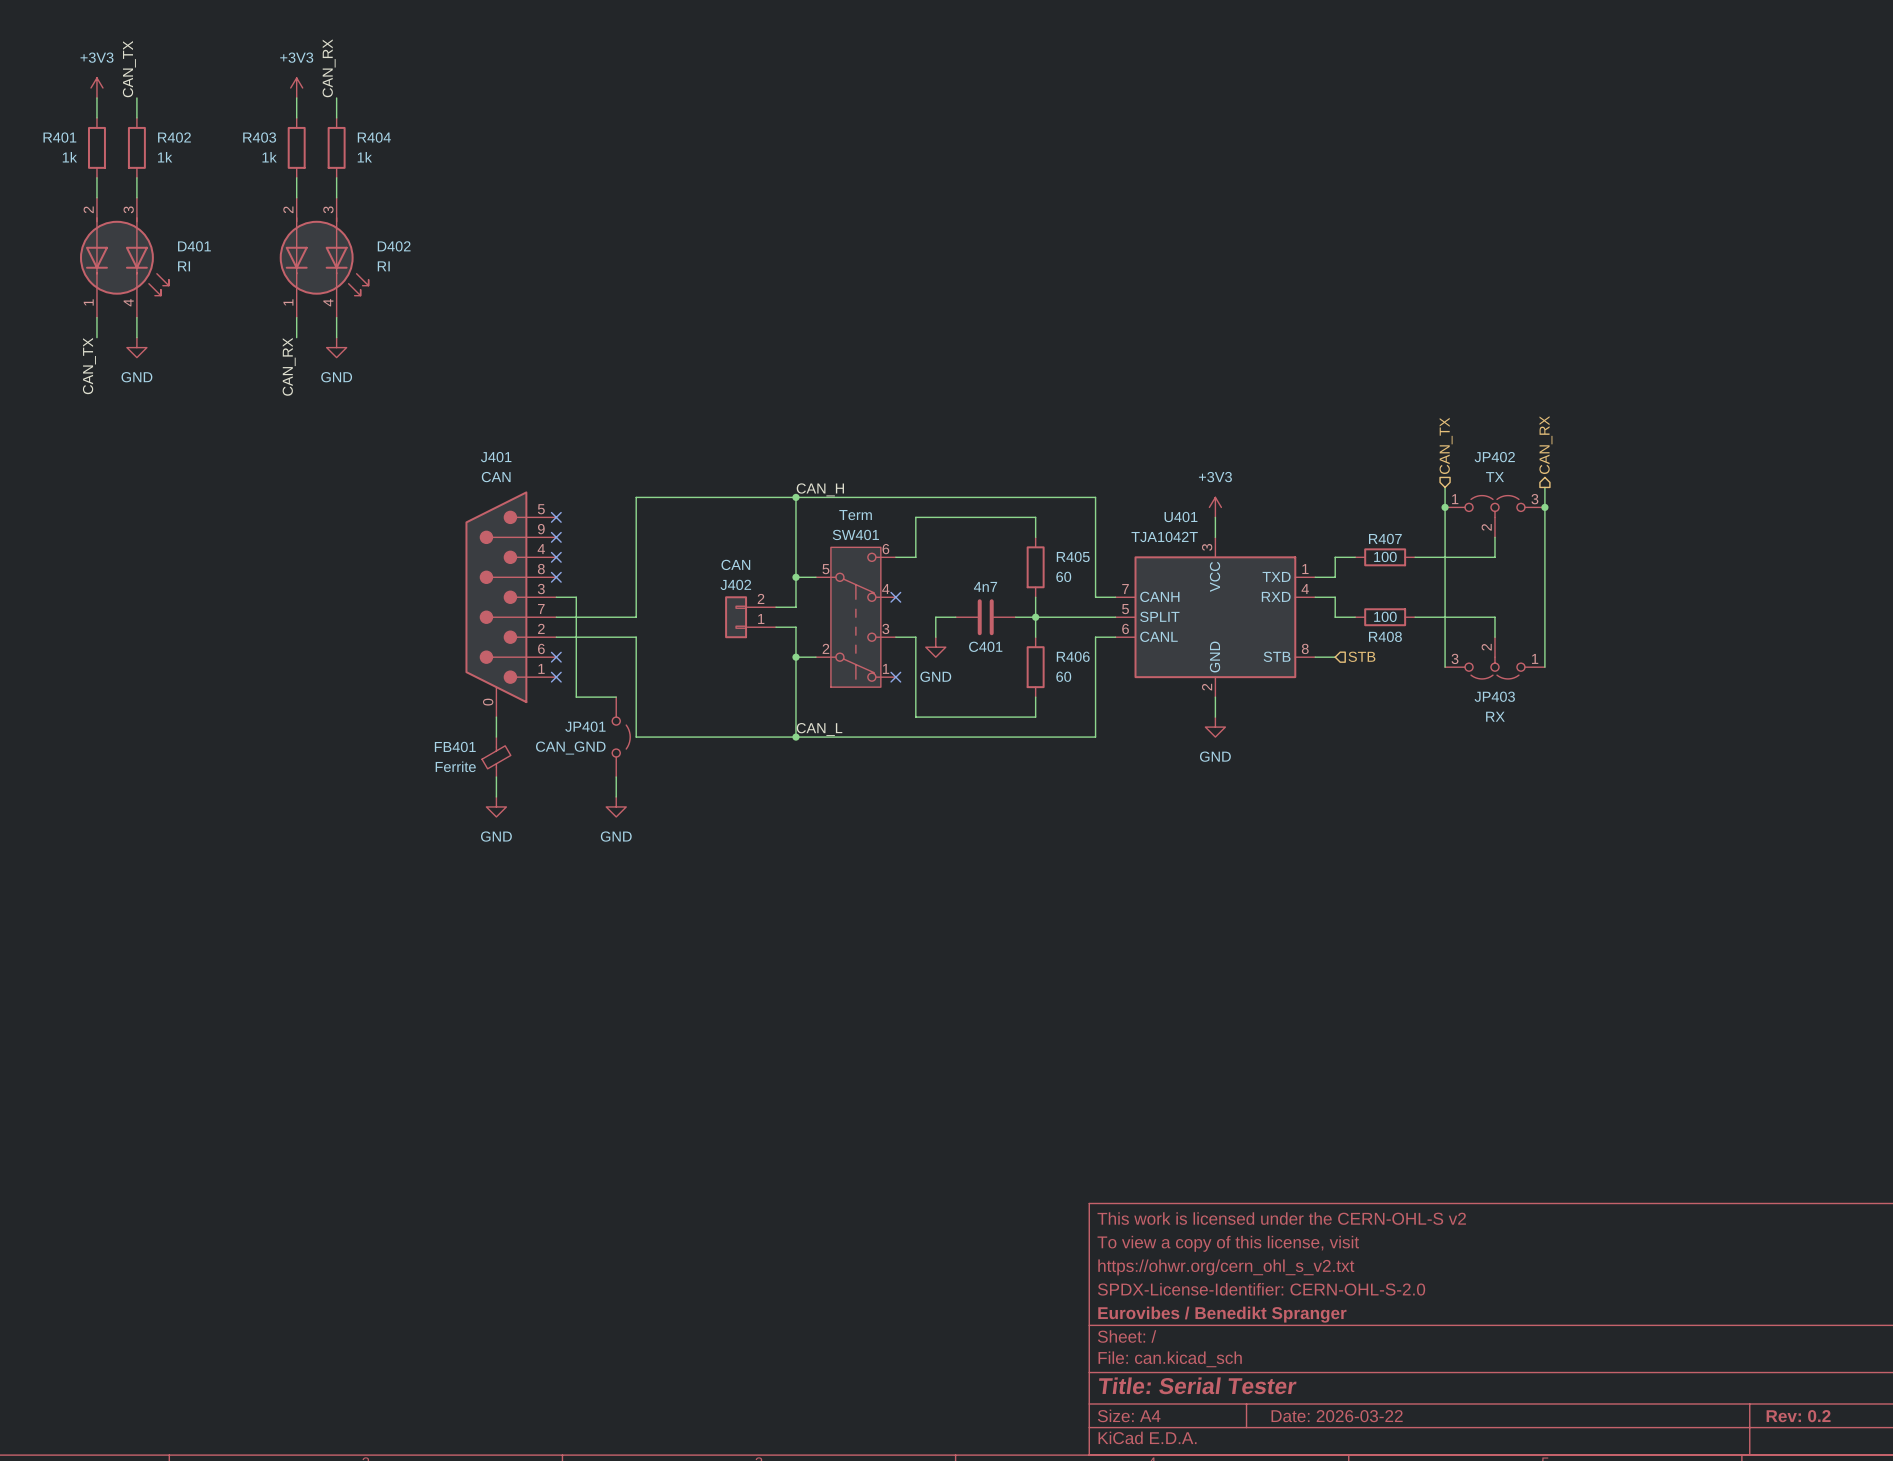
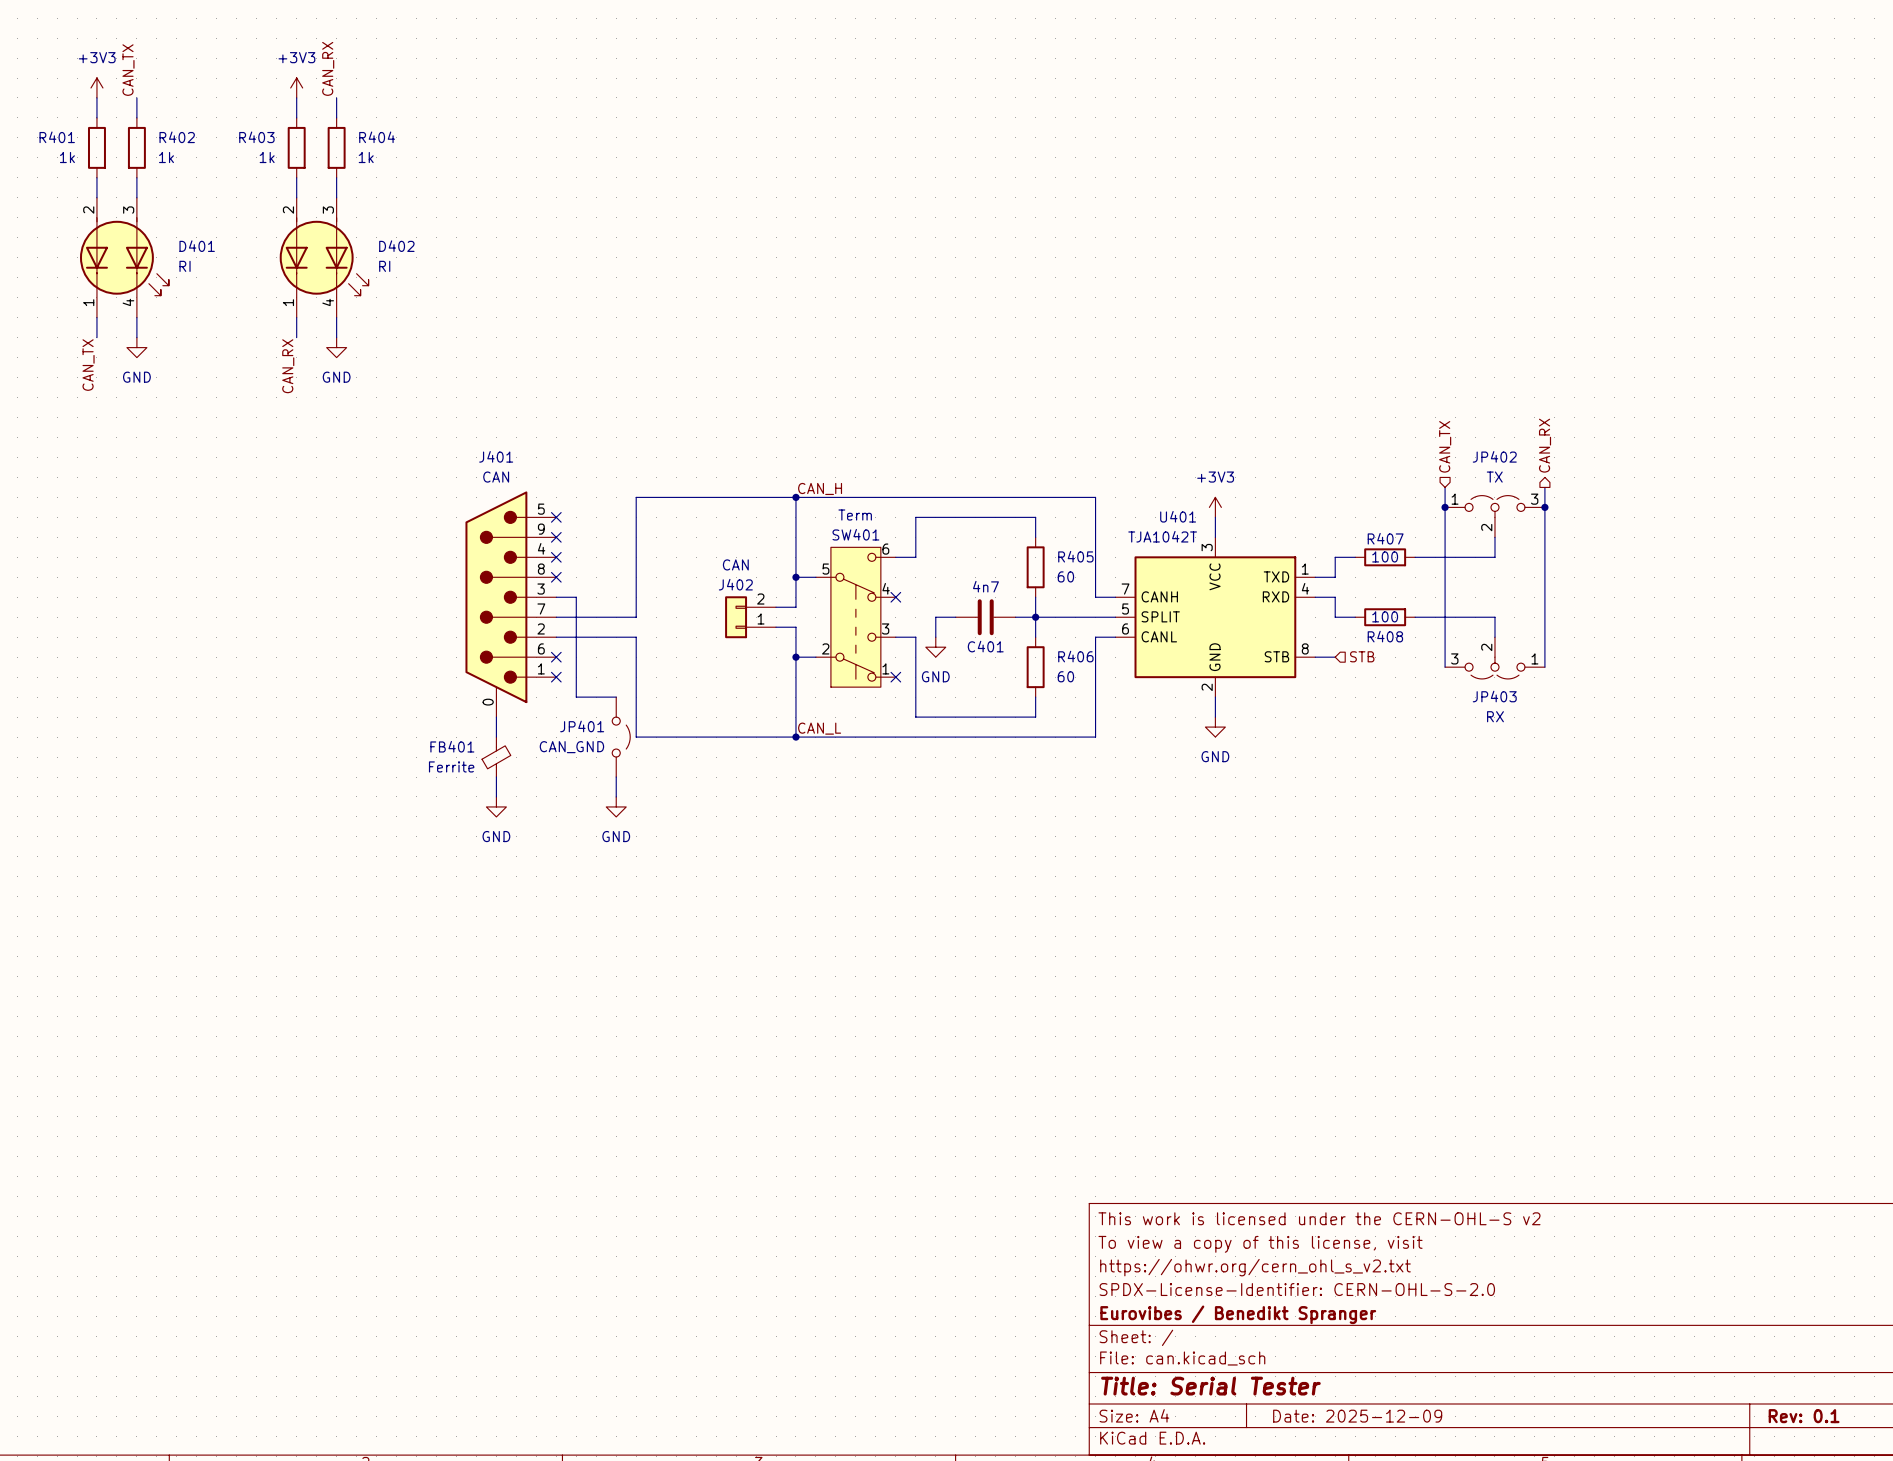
title block: Date: 2026-03-22 (1337, 1416) -> Date: 2025-12-09 (1357, 1416)
title block: Rev: 0.2 (1798, 1416) -> Rev: 0.1 (1804, 1416)

